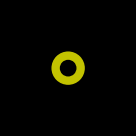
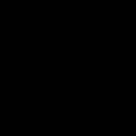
part: (68, 68) -> none

